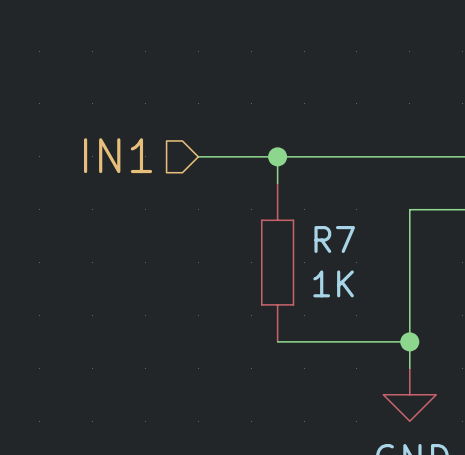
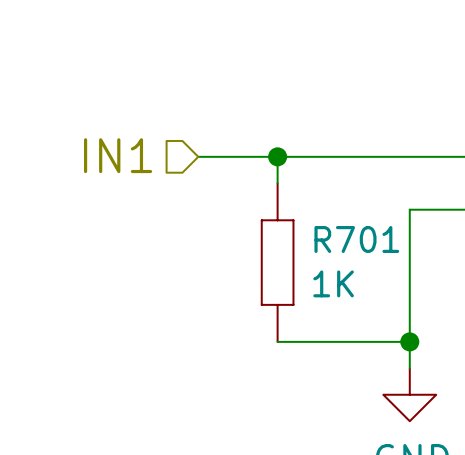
R7 name: R7 (334, 239) -> R701 (356, 239)

